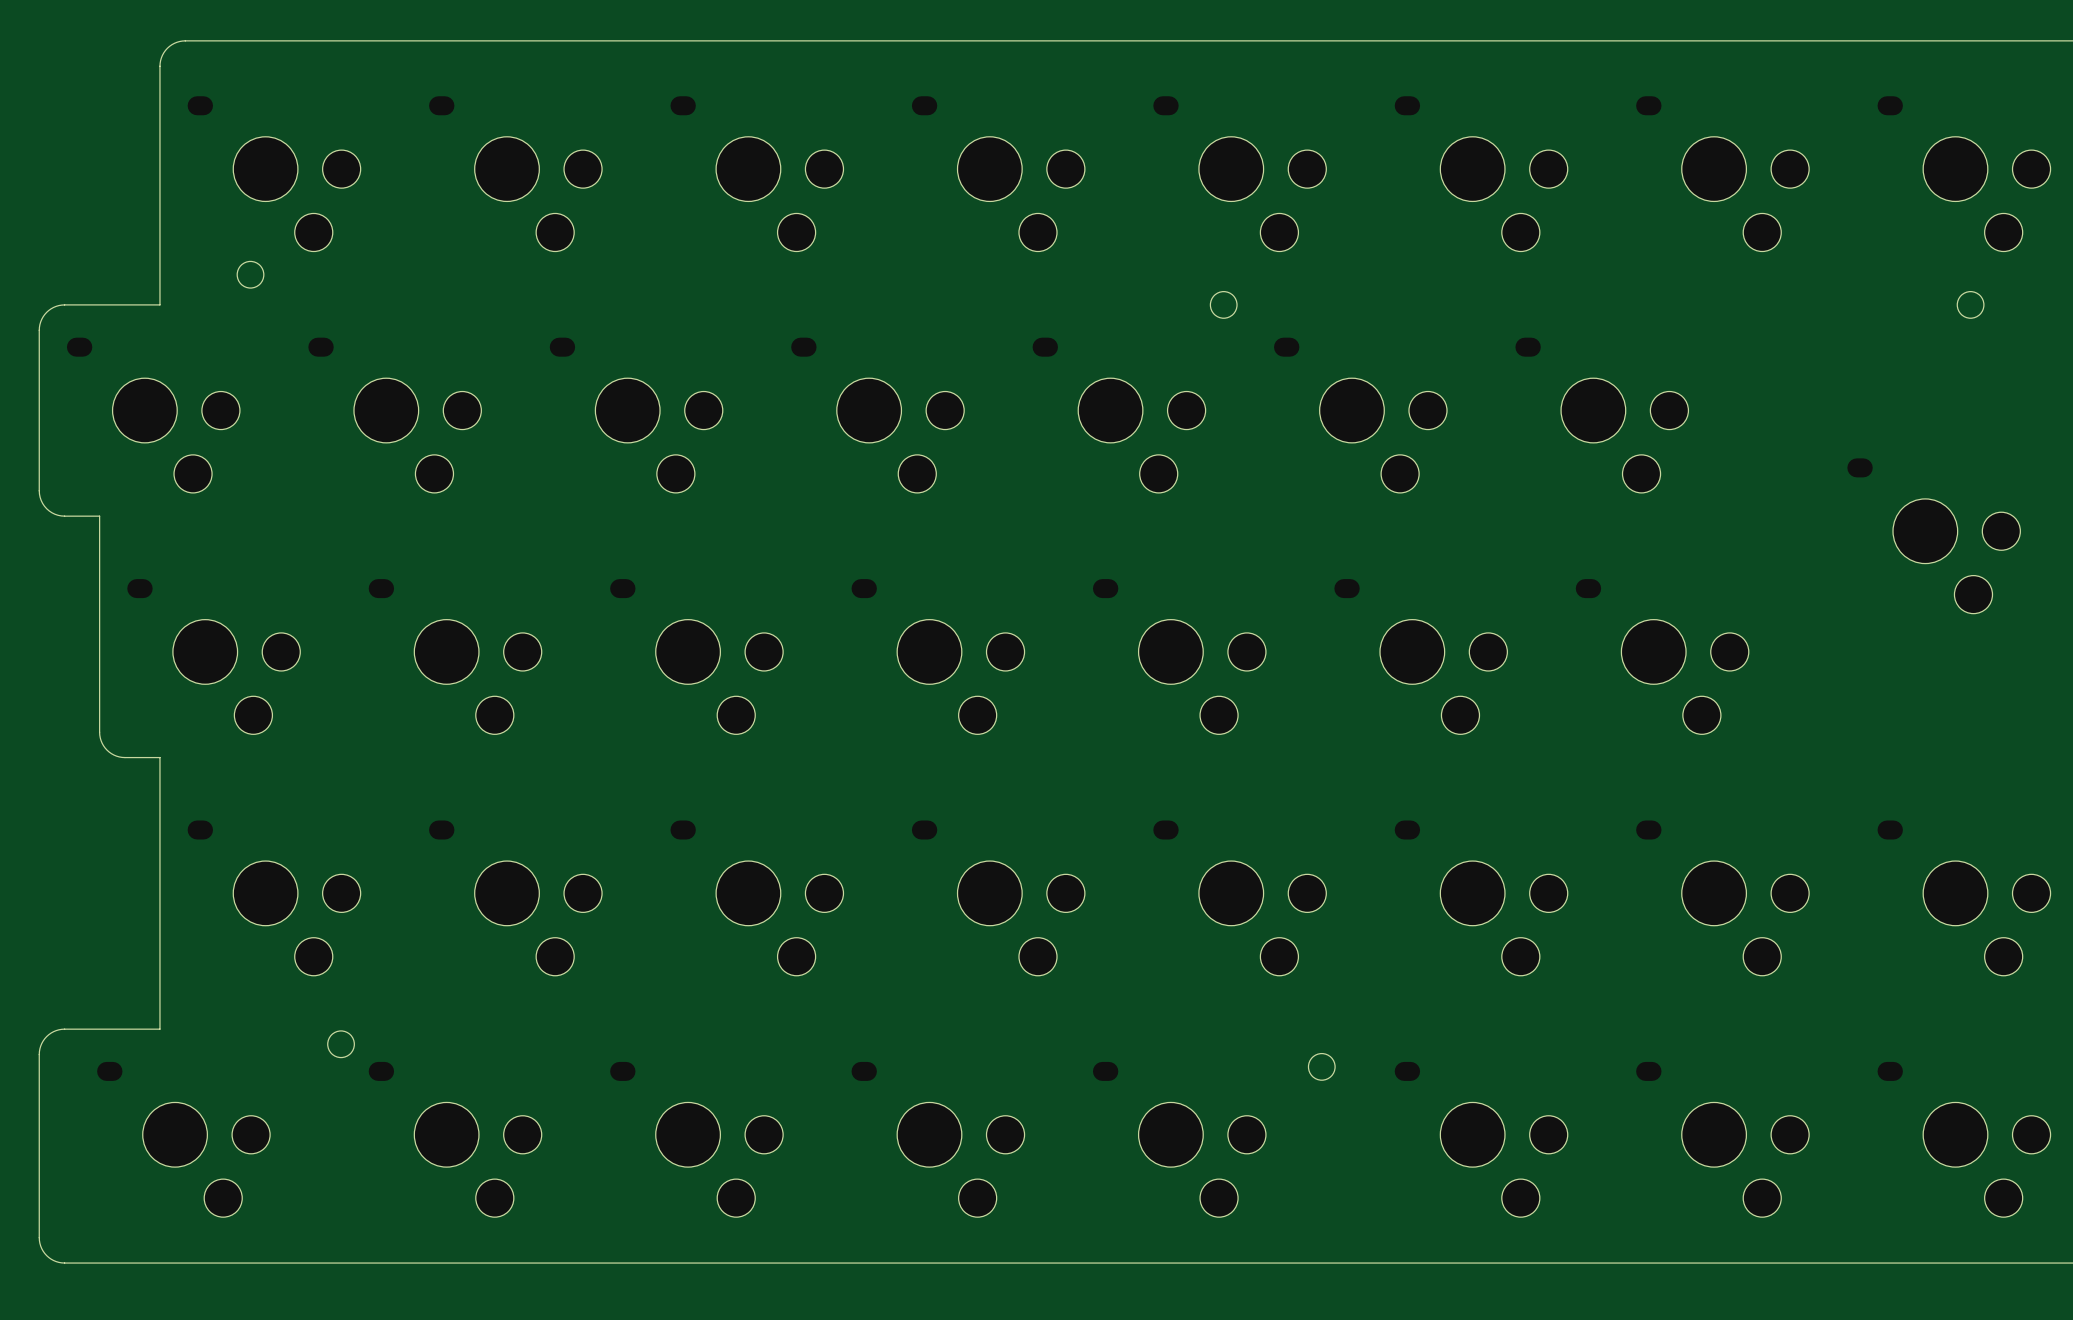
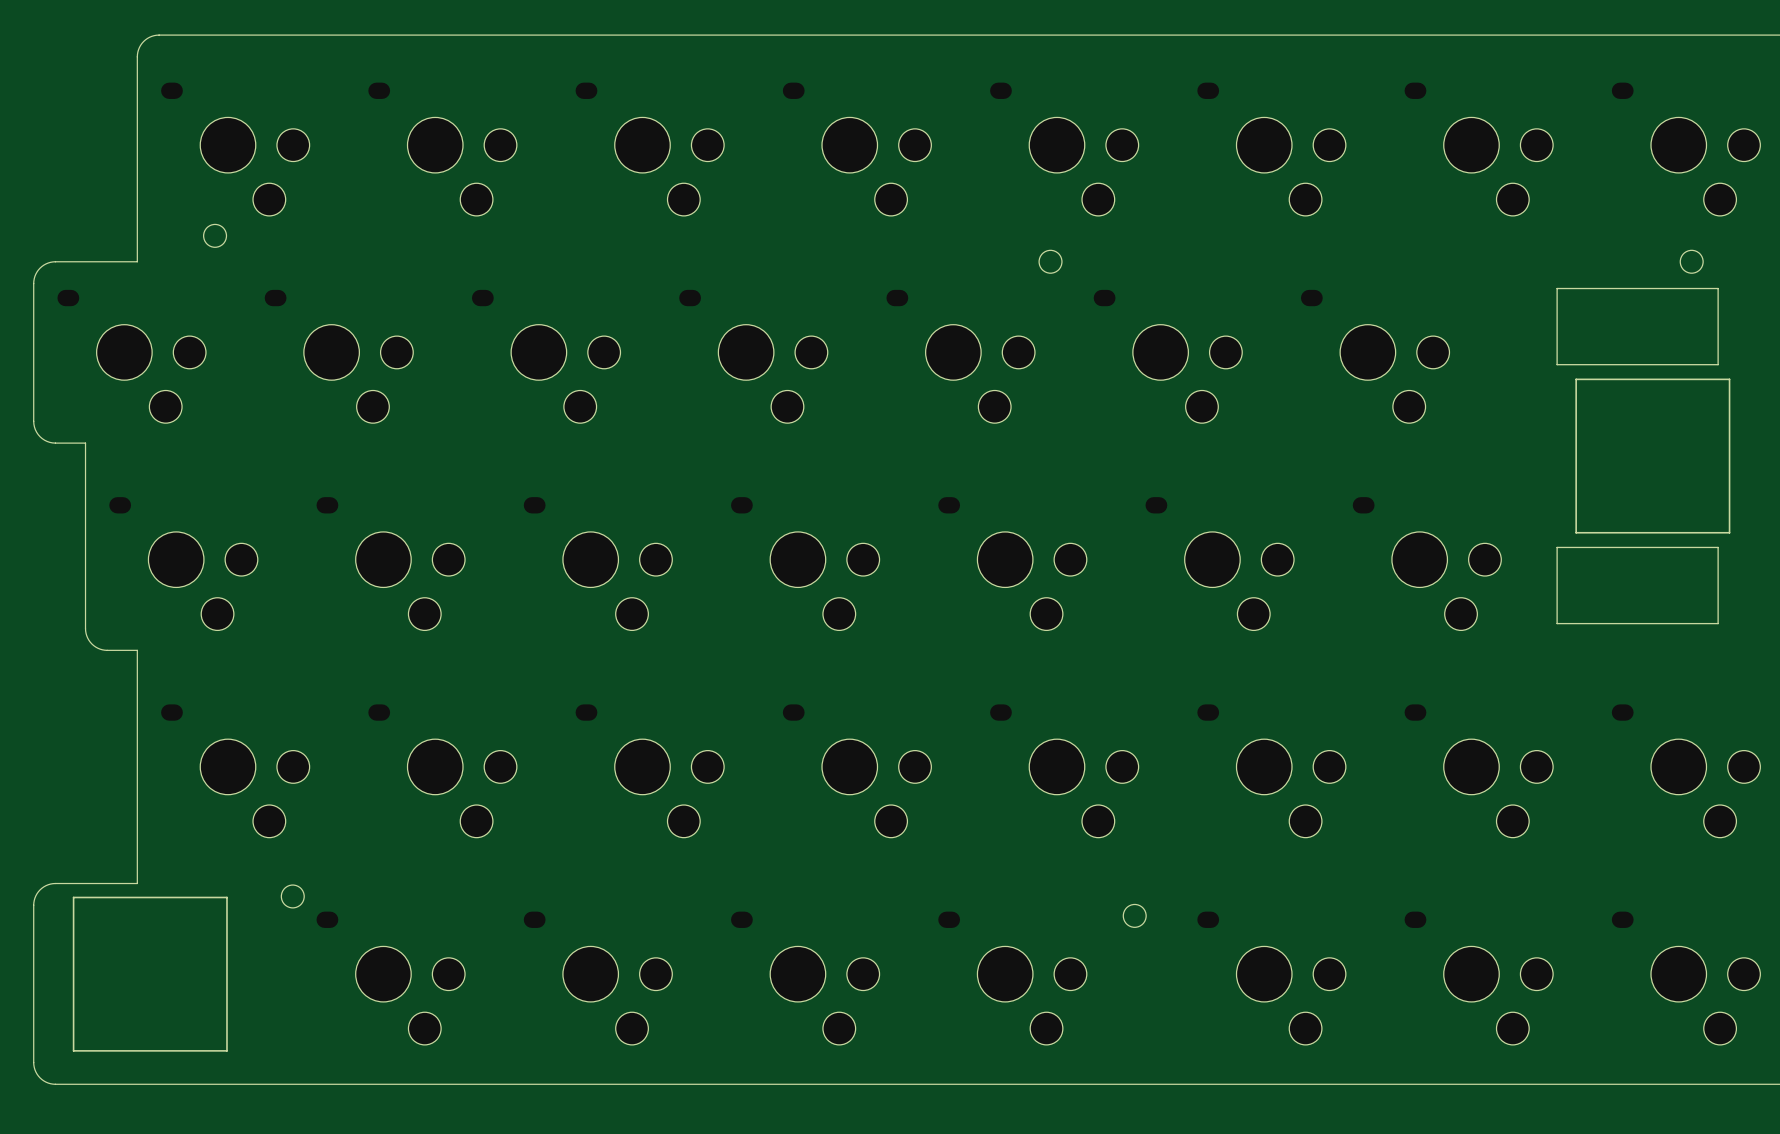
drawing: none -> [1556, 287, 1731, 625]
part: (1933, 535) -> none
drawing: none -> [72, 896, 228, 1052]
part: (183, 1139) -> none

